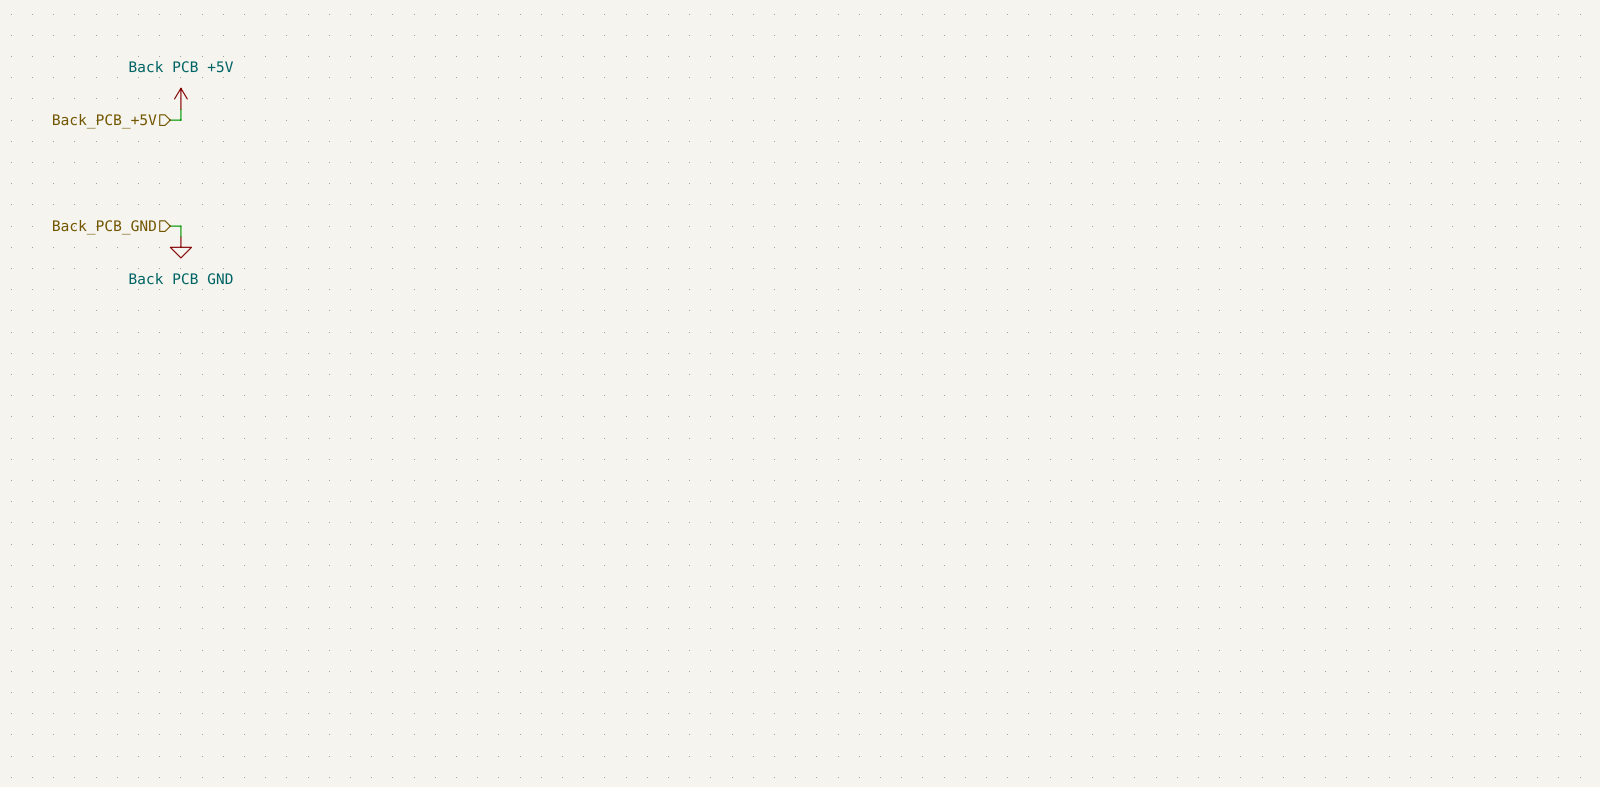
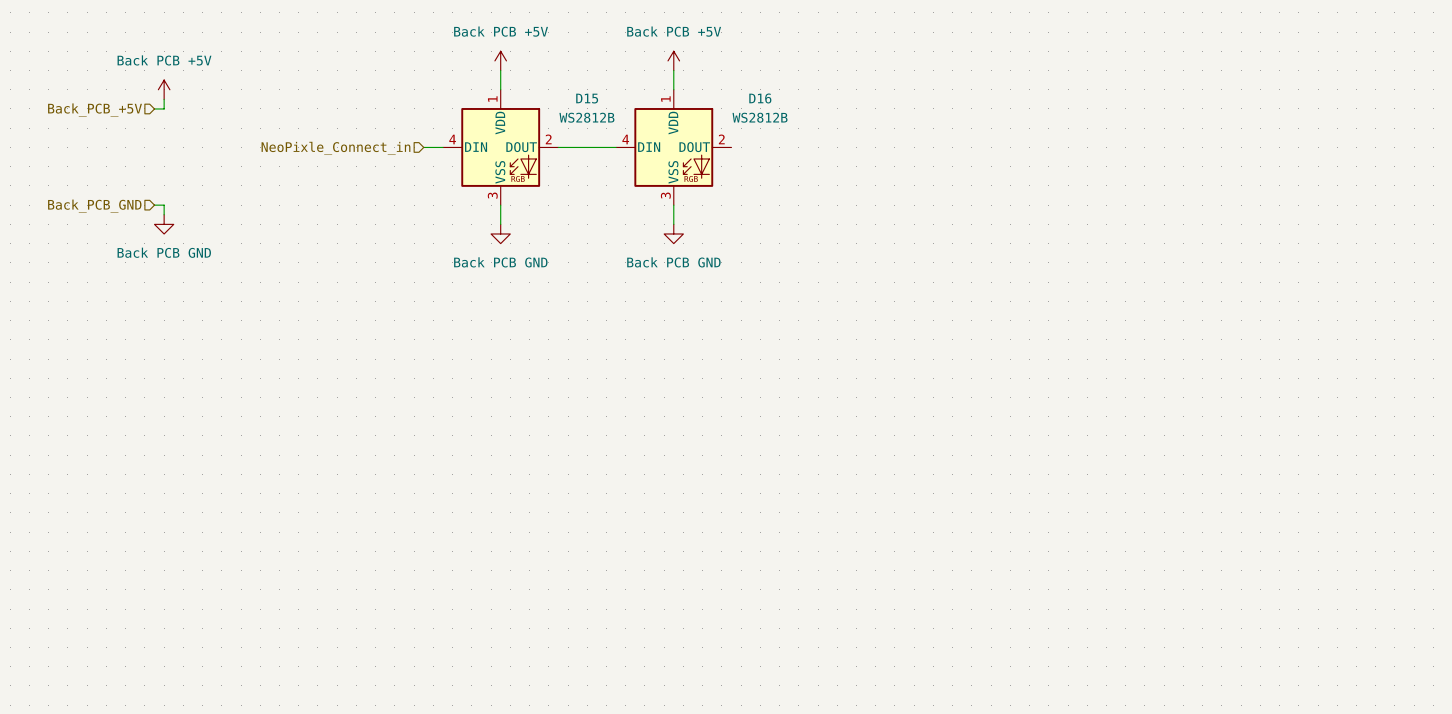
power symbol: none -> Back PCB +5V (500, 60)
power symbol: none -> Back PCB +5V (673, 60)
wire: none -> (500, 70) (500, 89)
wire: none -> (673, 70) (673, 89)
wire: none -> (423, 147) (443, 147)
D15: none -> WS2812B (500, 147)
wire: none -> (558, 147) (616, 147)
D16: none -> WS2812B (673, 147)
hierarchical label: none -> NeoPixle_Connect_in (335, 148)
wire: none -> (500, 205) (500, 224)
wire: none -> (673, 205) (673, 224)
power symbol: none -> Back PCB GND (500, 233)
power symbol: none -> Back PCB GND (673, 233)

